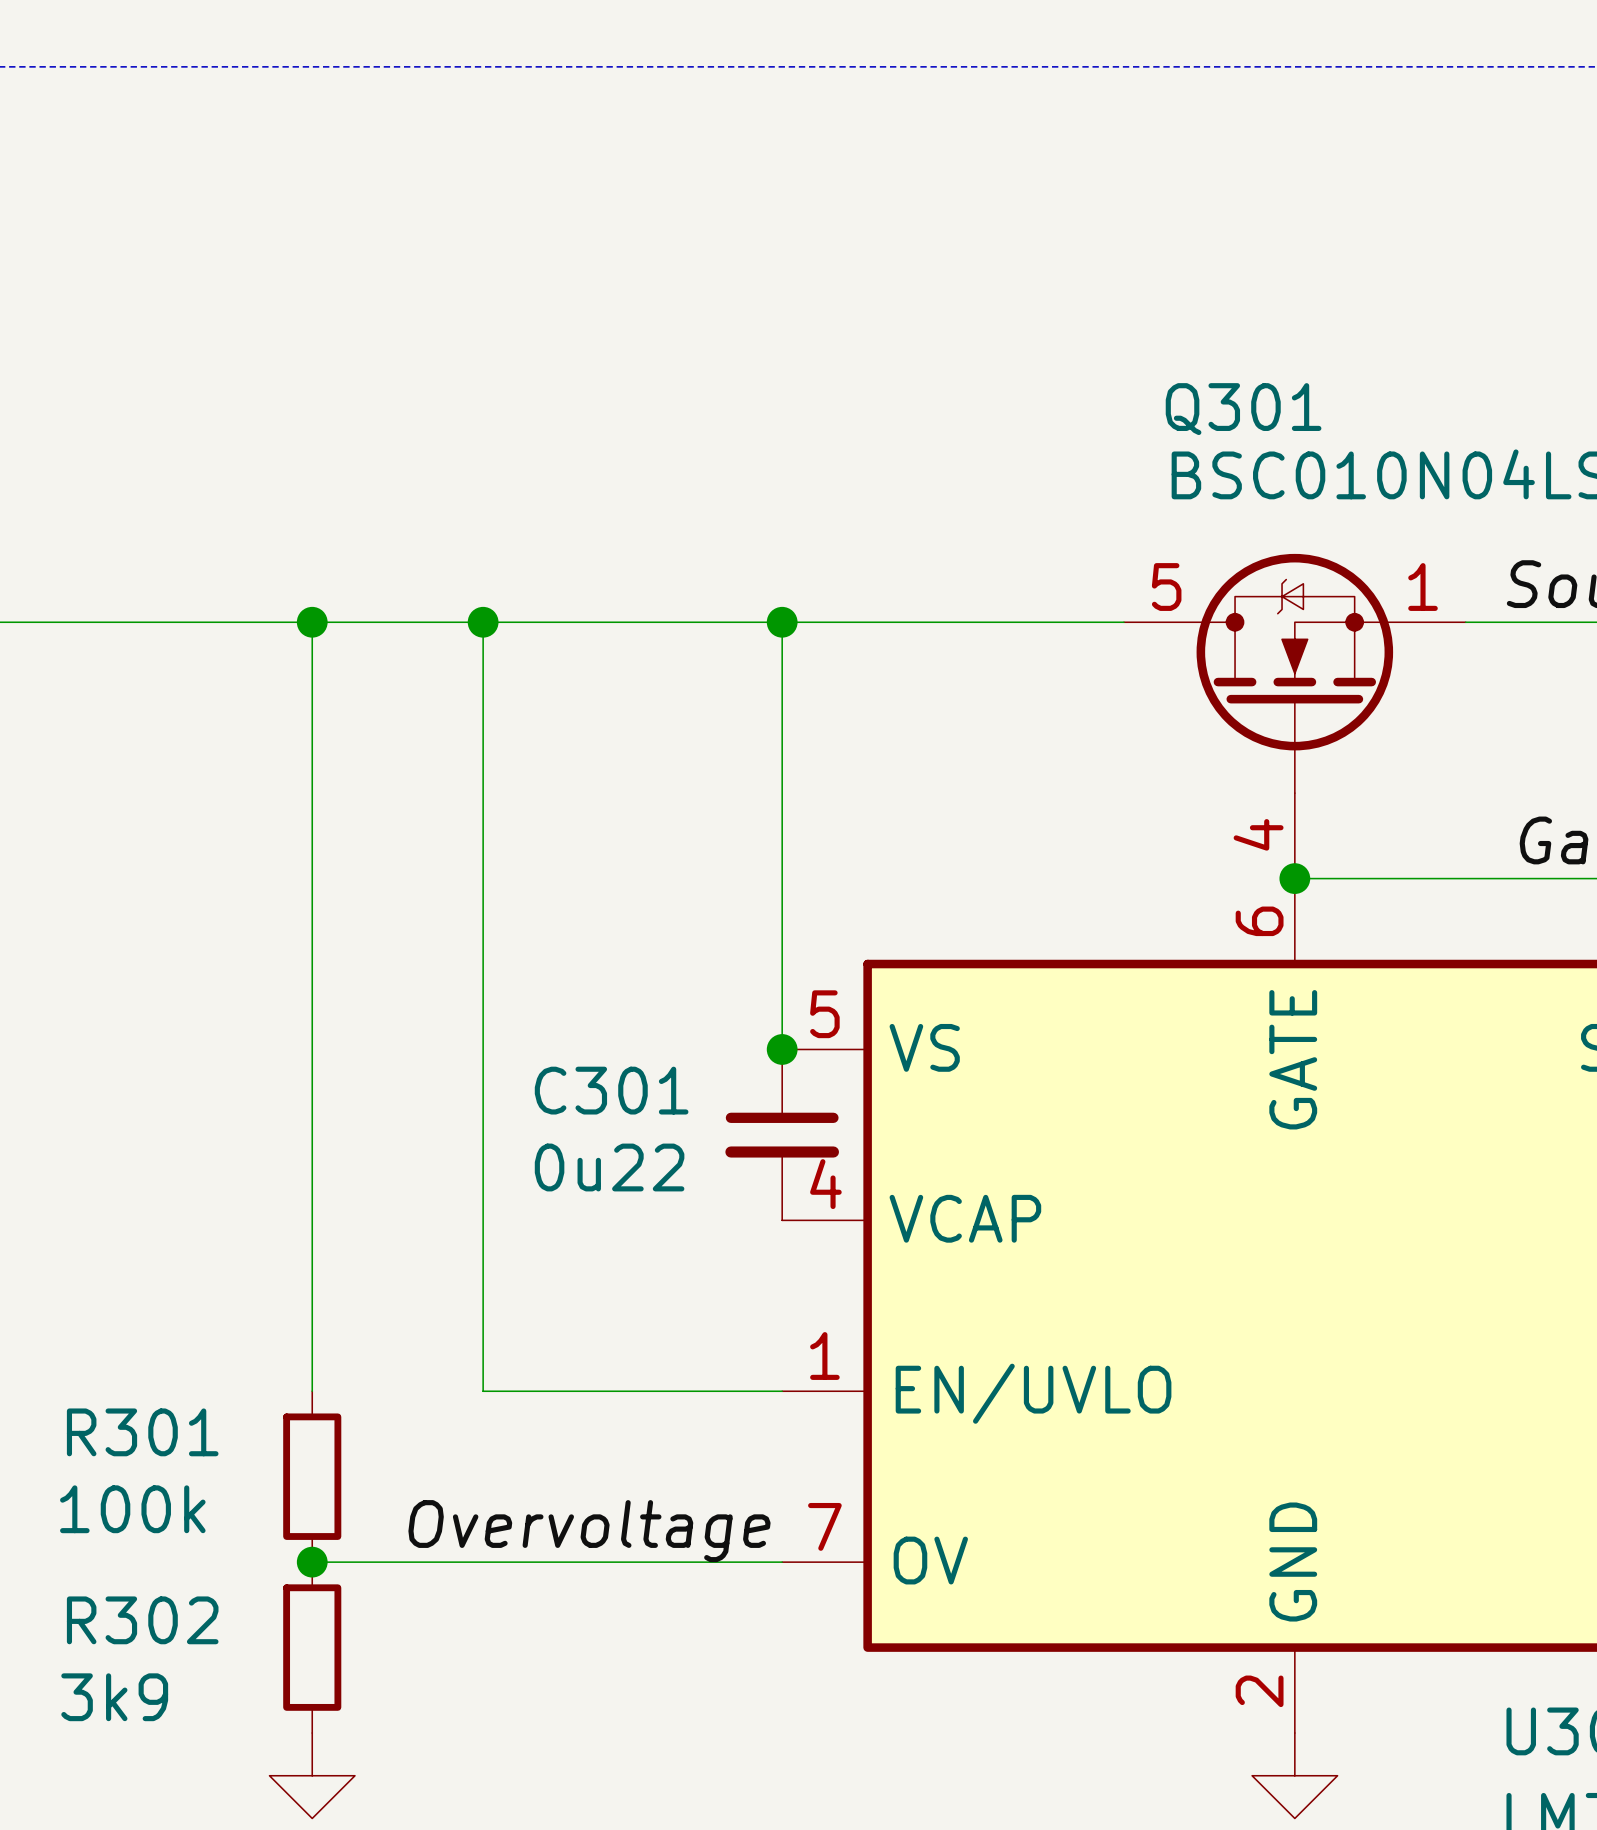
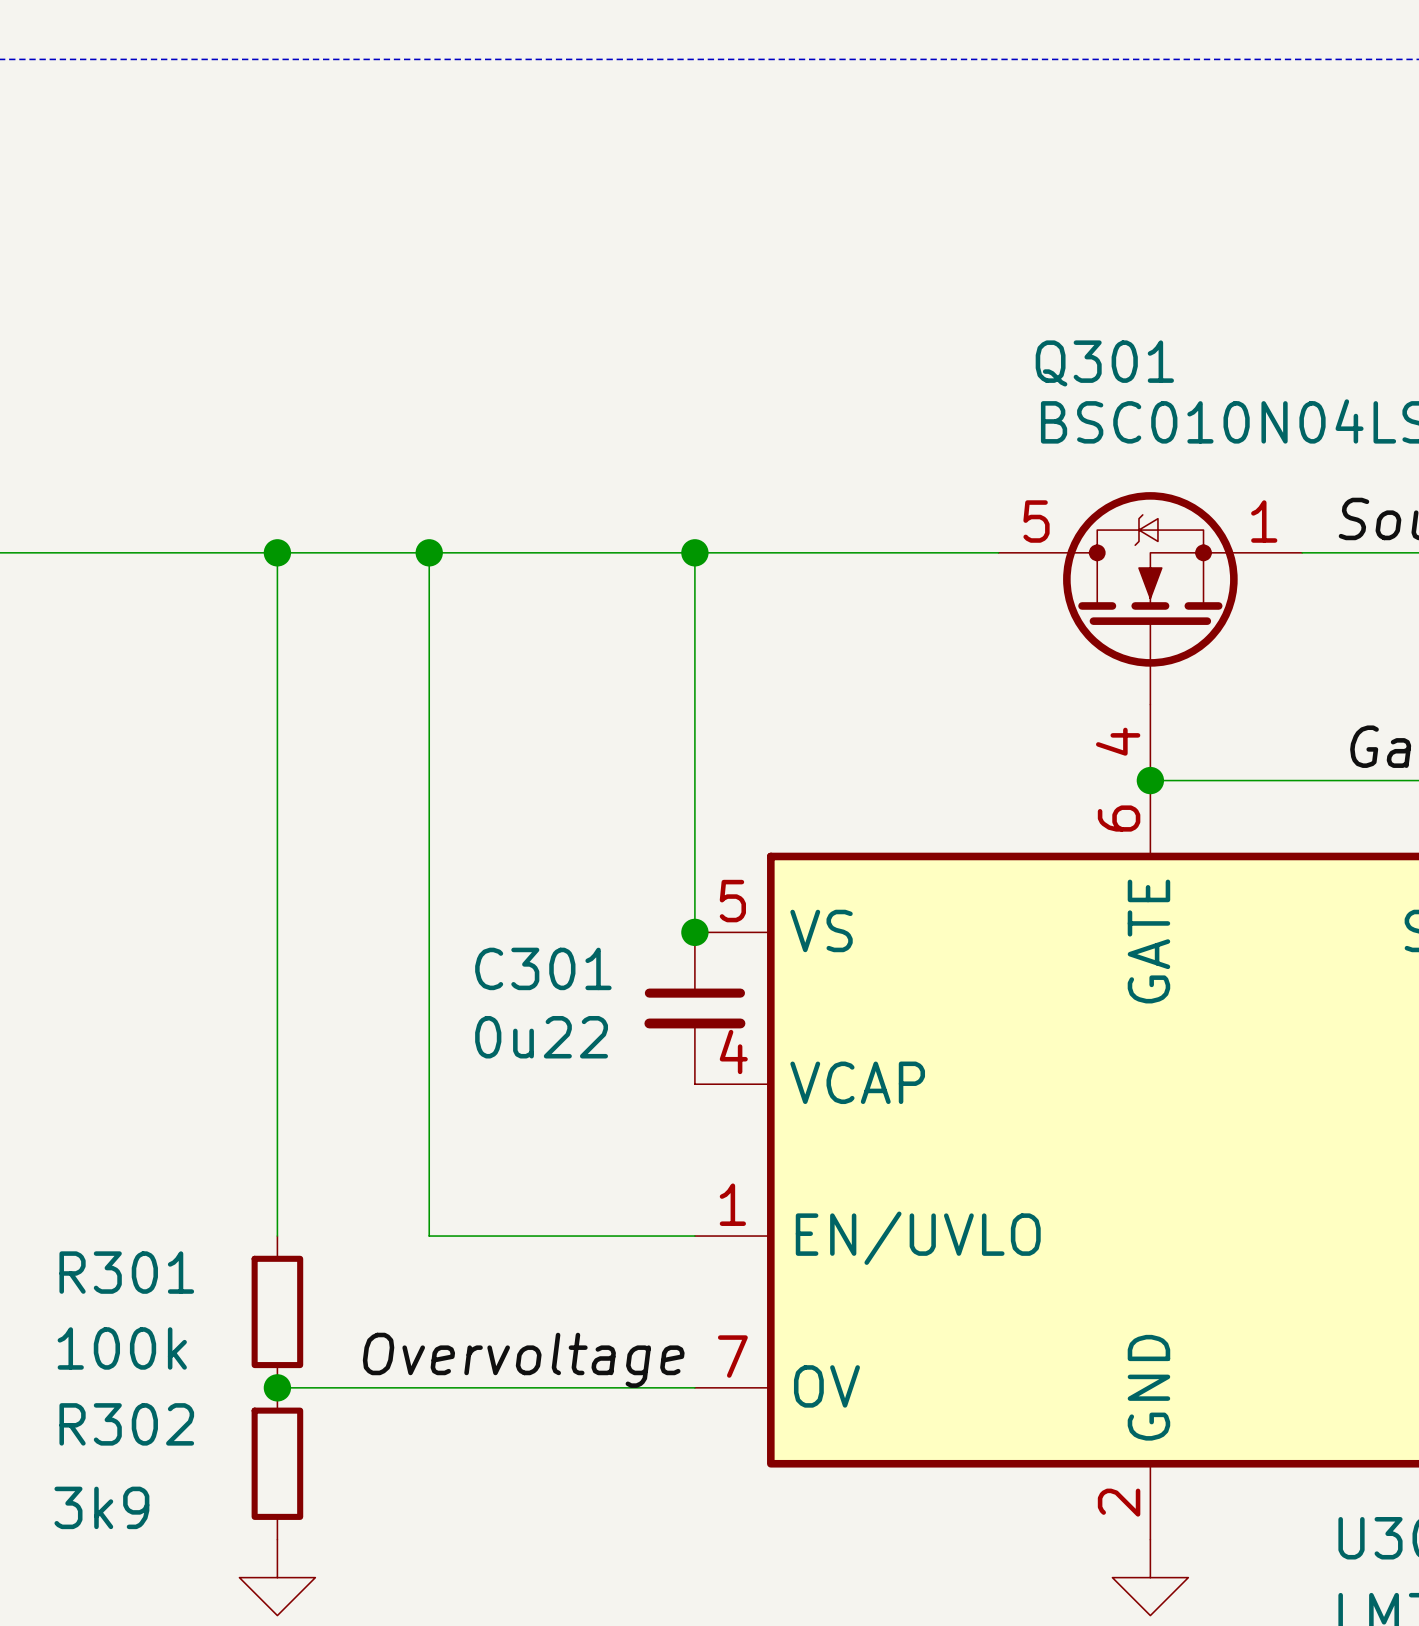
R301 value position: 100k (132, 1509) -> 100k (122, 1348)
R302 name position: R302 (142, 1620) -> R302 (126, 1424)

